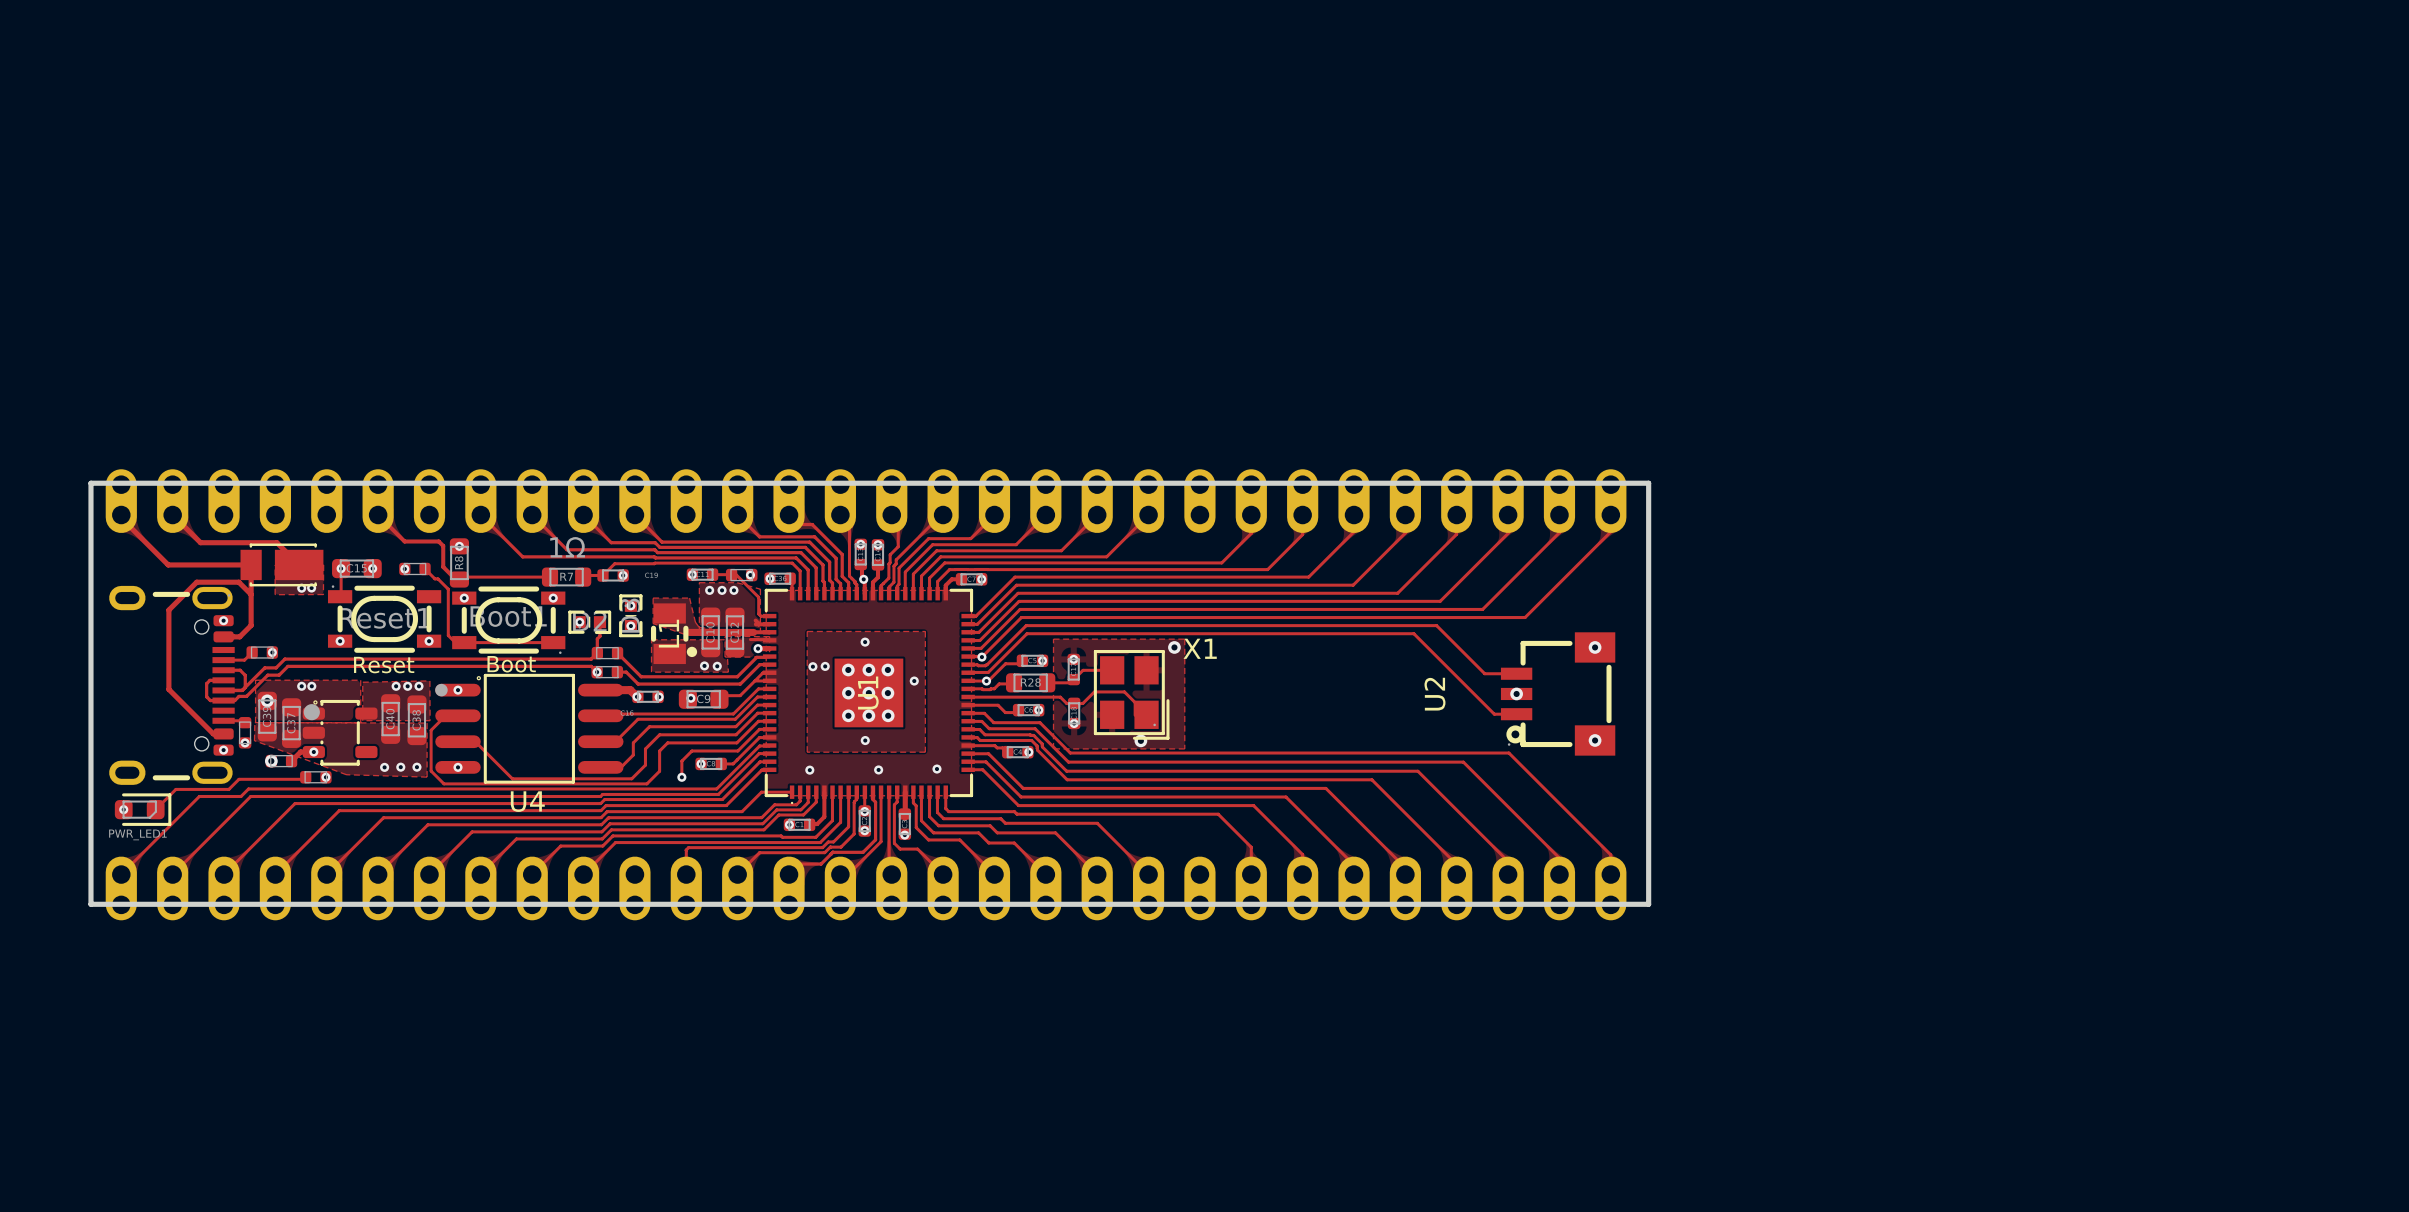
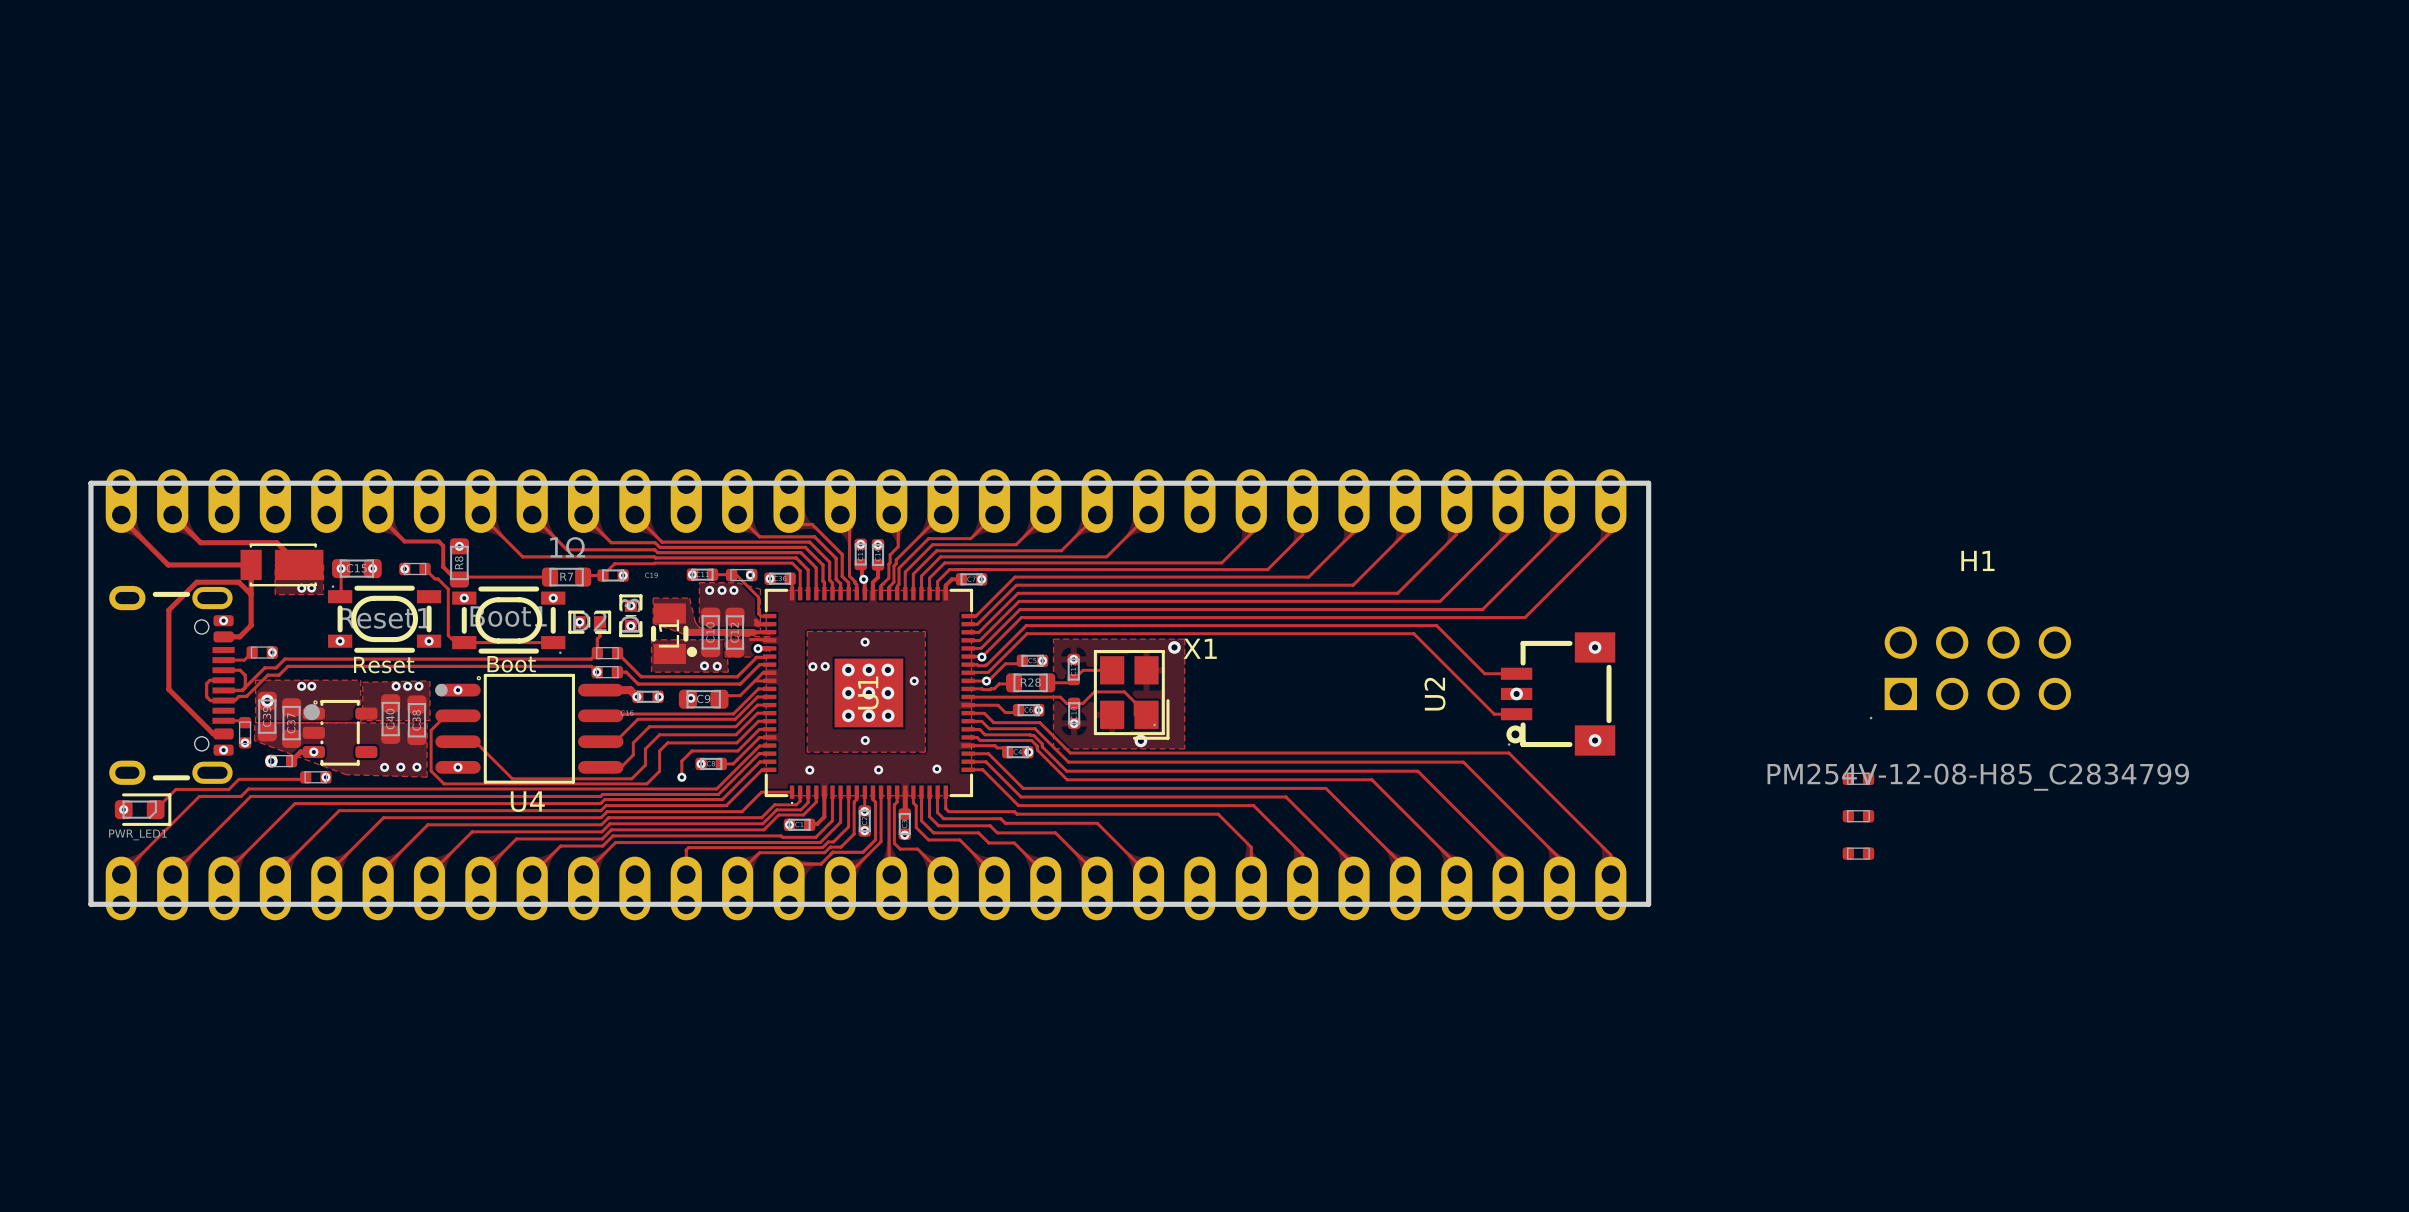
H1: none -> PM254V-12-08-H85_C2834799 (1953, 653)
part: none -> (1858, 778)
part: none -> (1858, 816)
part: none -> (1858, 853)

